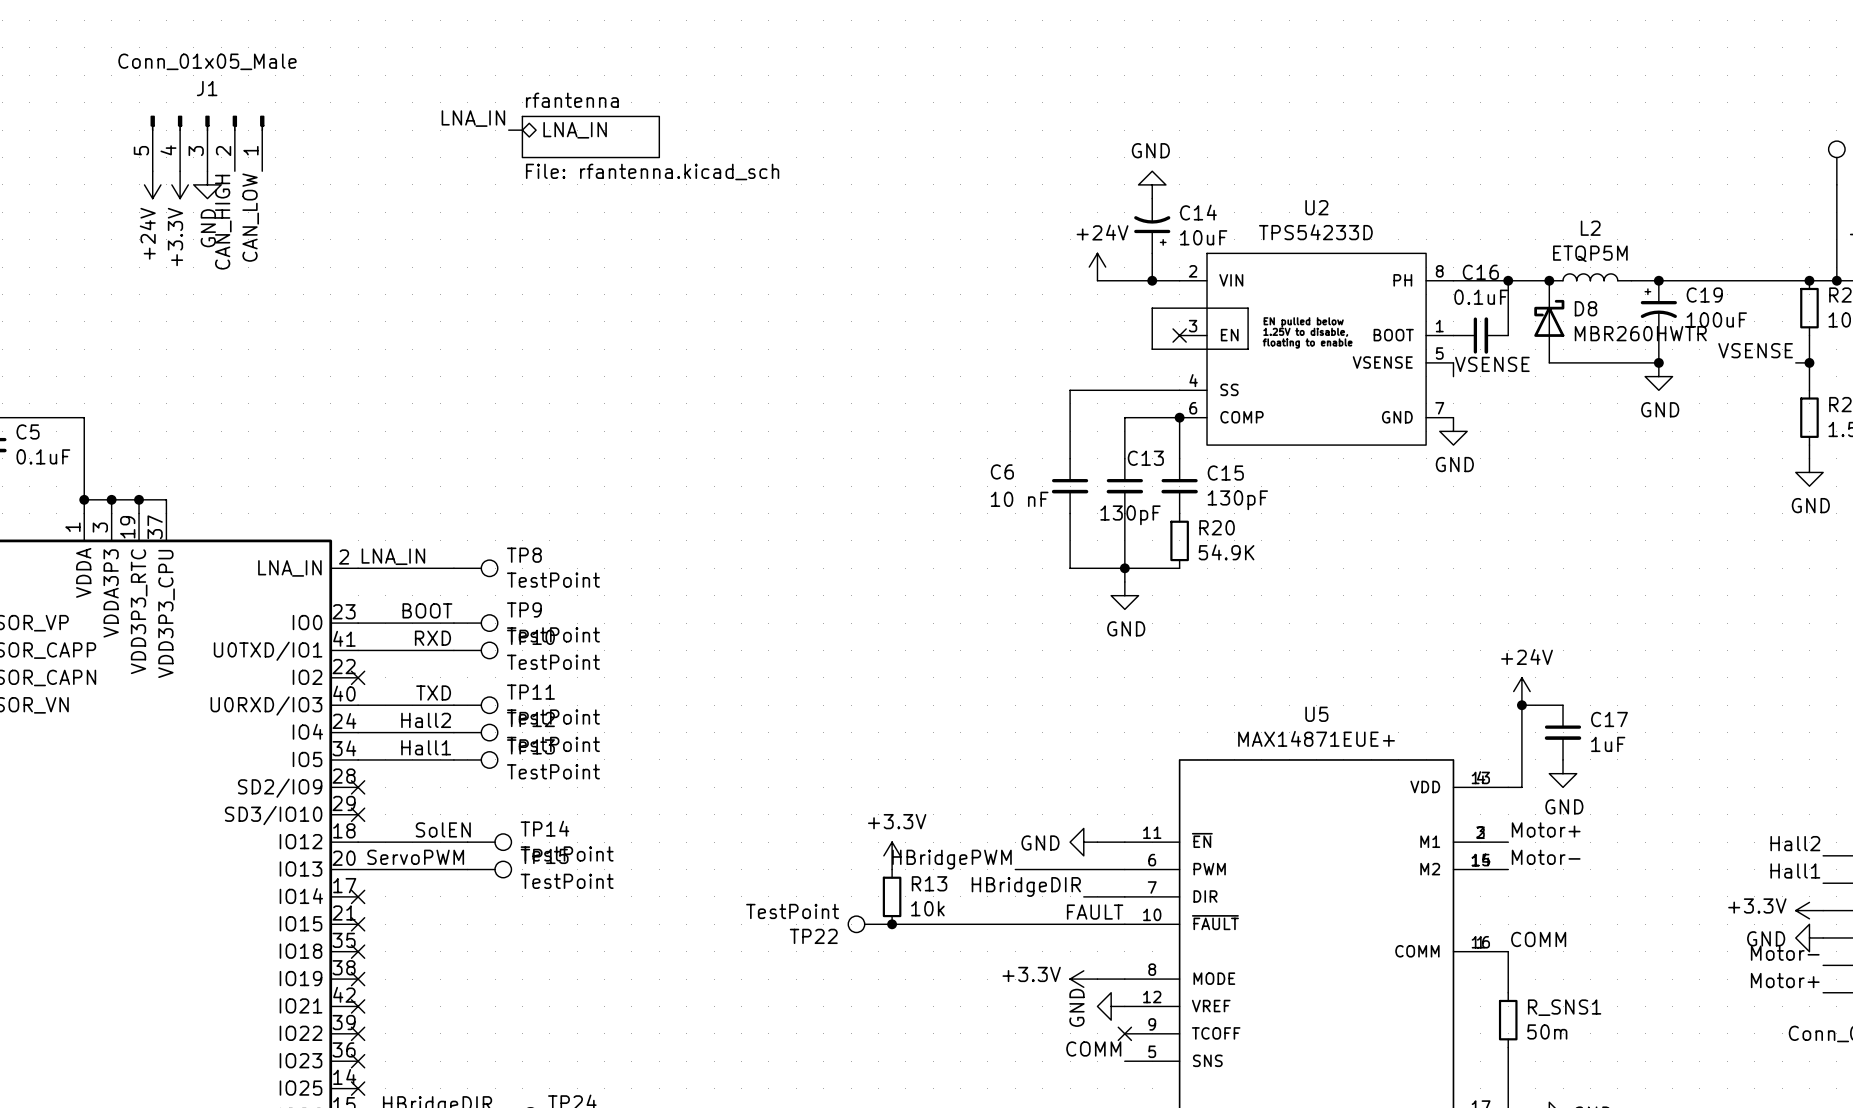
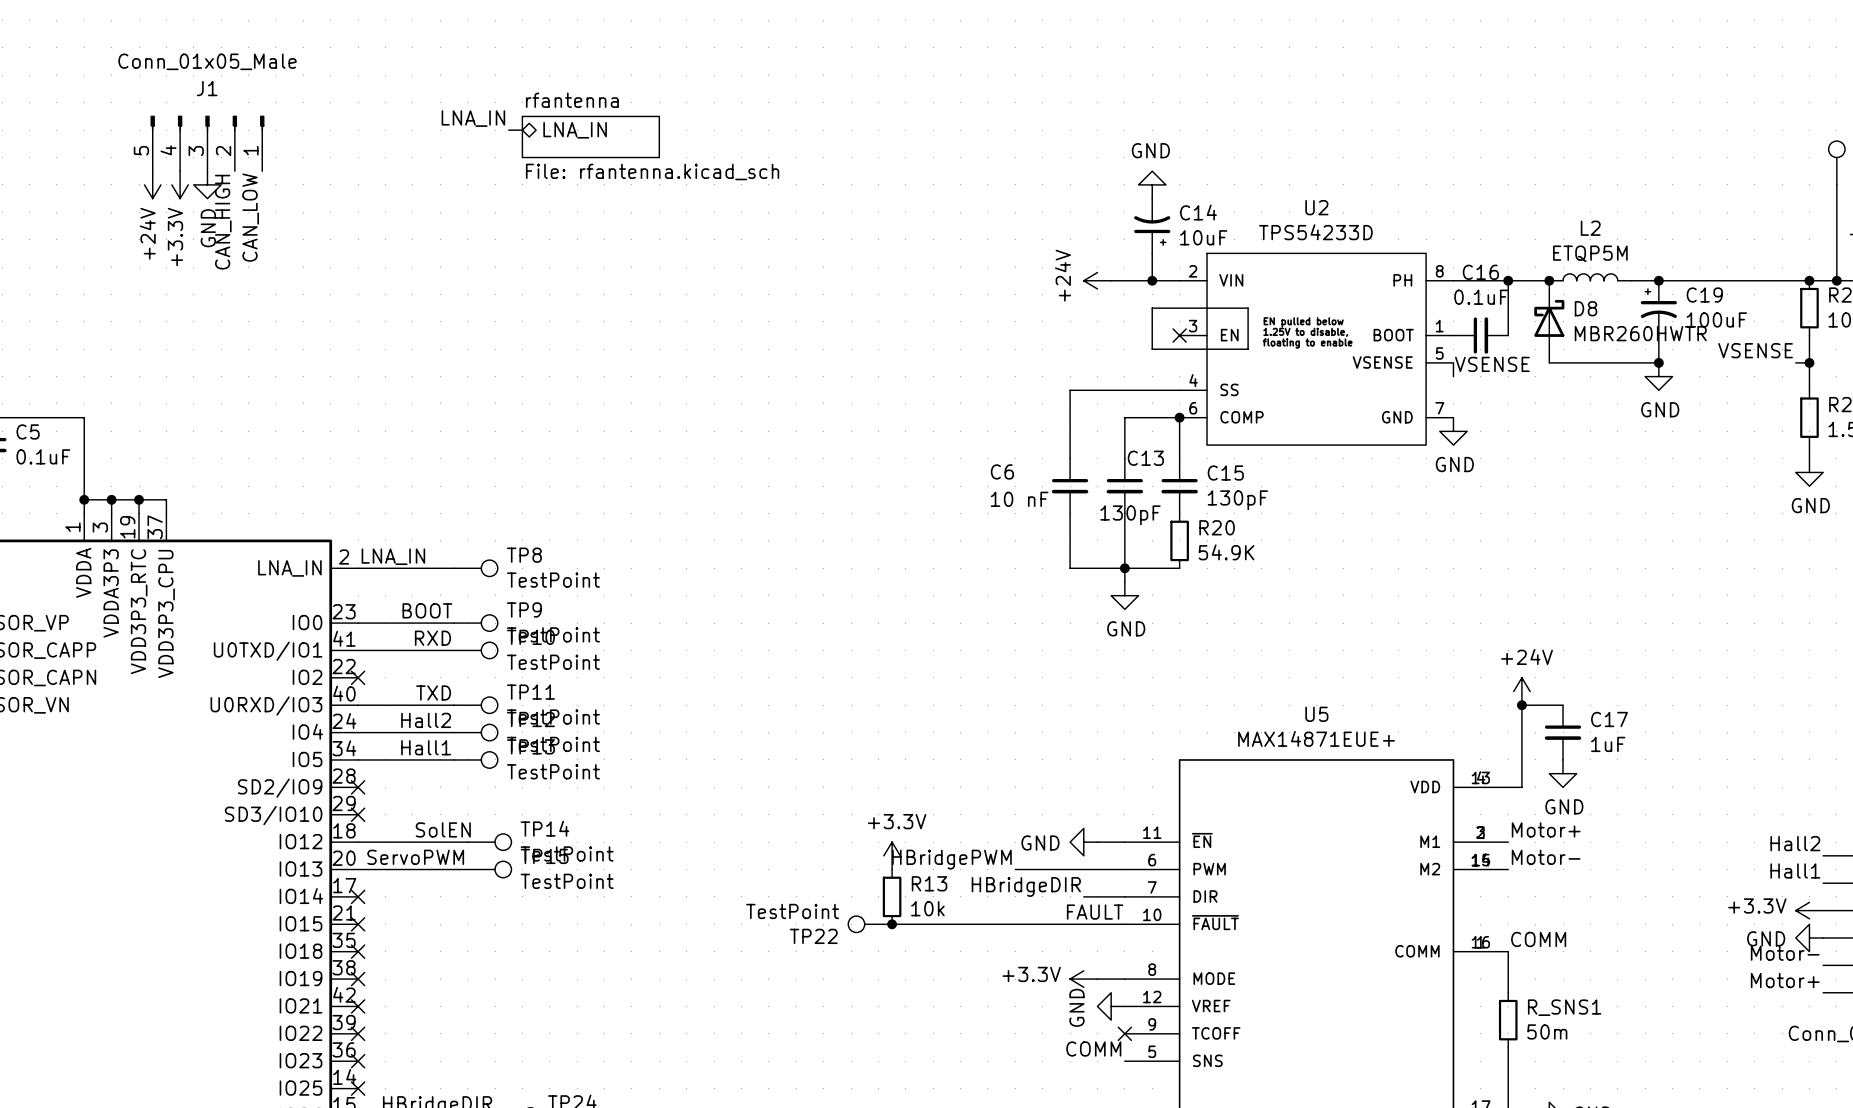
power symbol rotation: 0° (1097, 267) -> 90° counterclockwise (1097, 280)

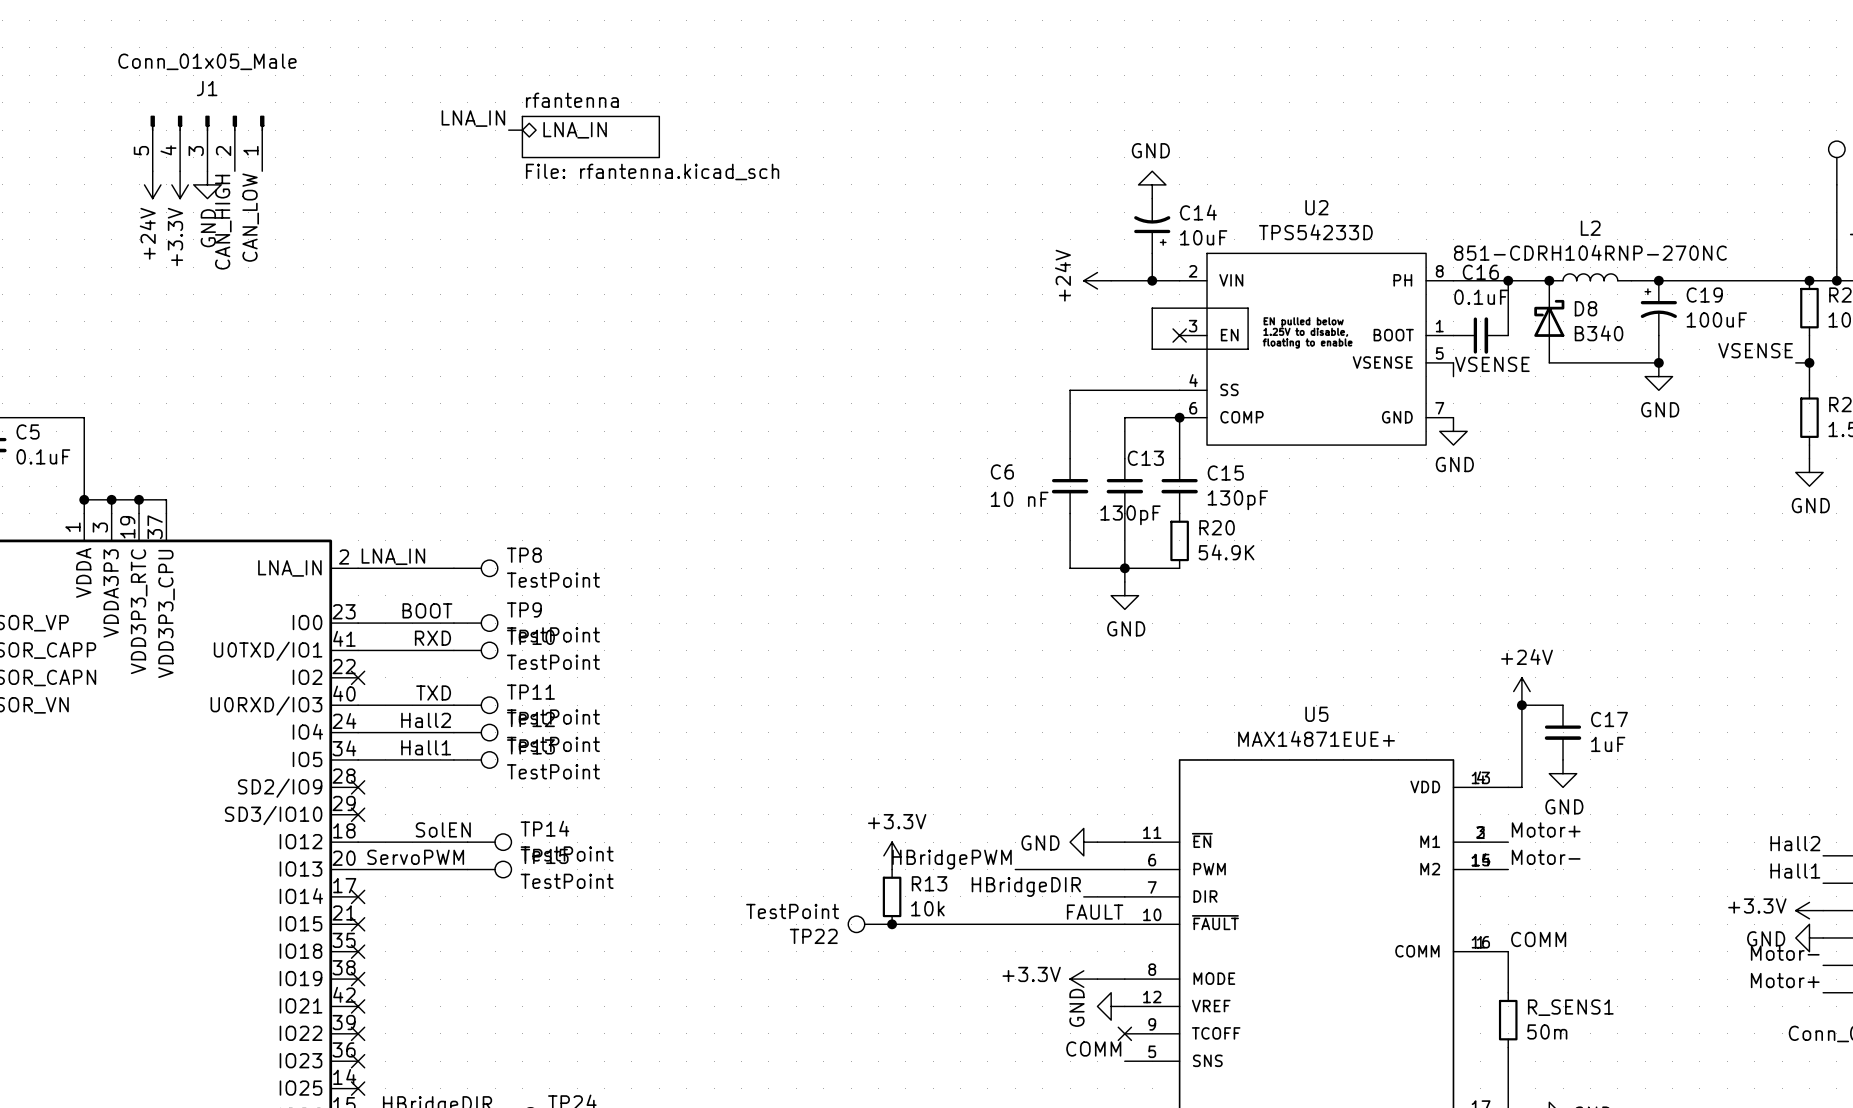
L2 value: ETQP5M (1590, 253) -> 851-CDRH104RNP-270NC (1590, 252)
D8 value: MBR260HWTR (1640, 333) -> B340 (1599, 333)
R_SNS1 name: R_SNS1 (1564, 1007) -> R_SENS1 (1570, 1007)

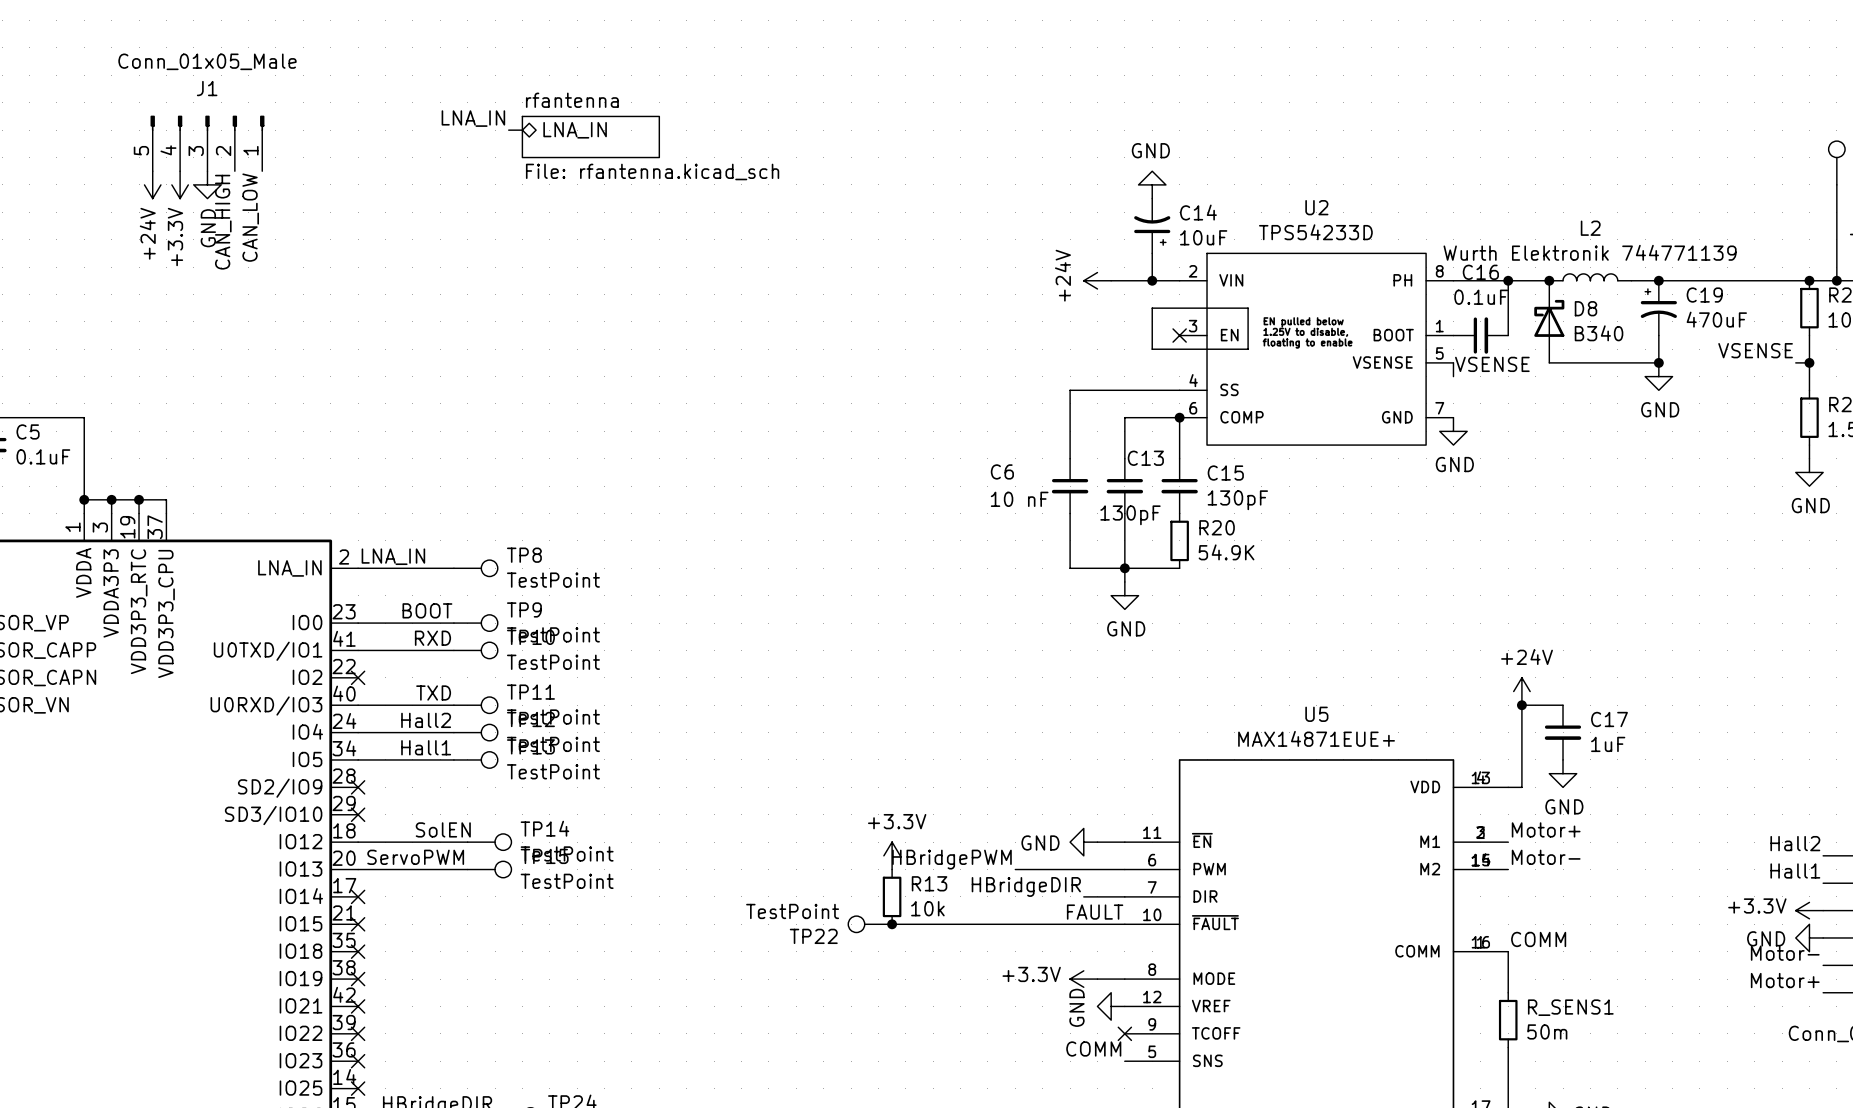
L2 value: 851-CDRH104RNP-270NC (1590, 252) -> Wurth Elektronik 744771139 (1590, 252)
C19 value: 100uF (1716, 319) -> 470uF (1716, 319)

